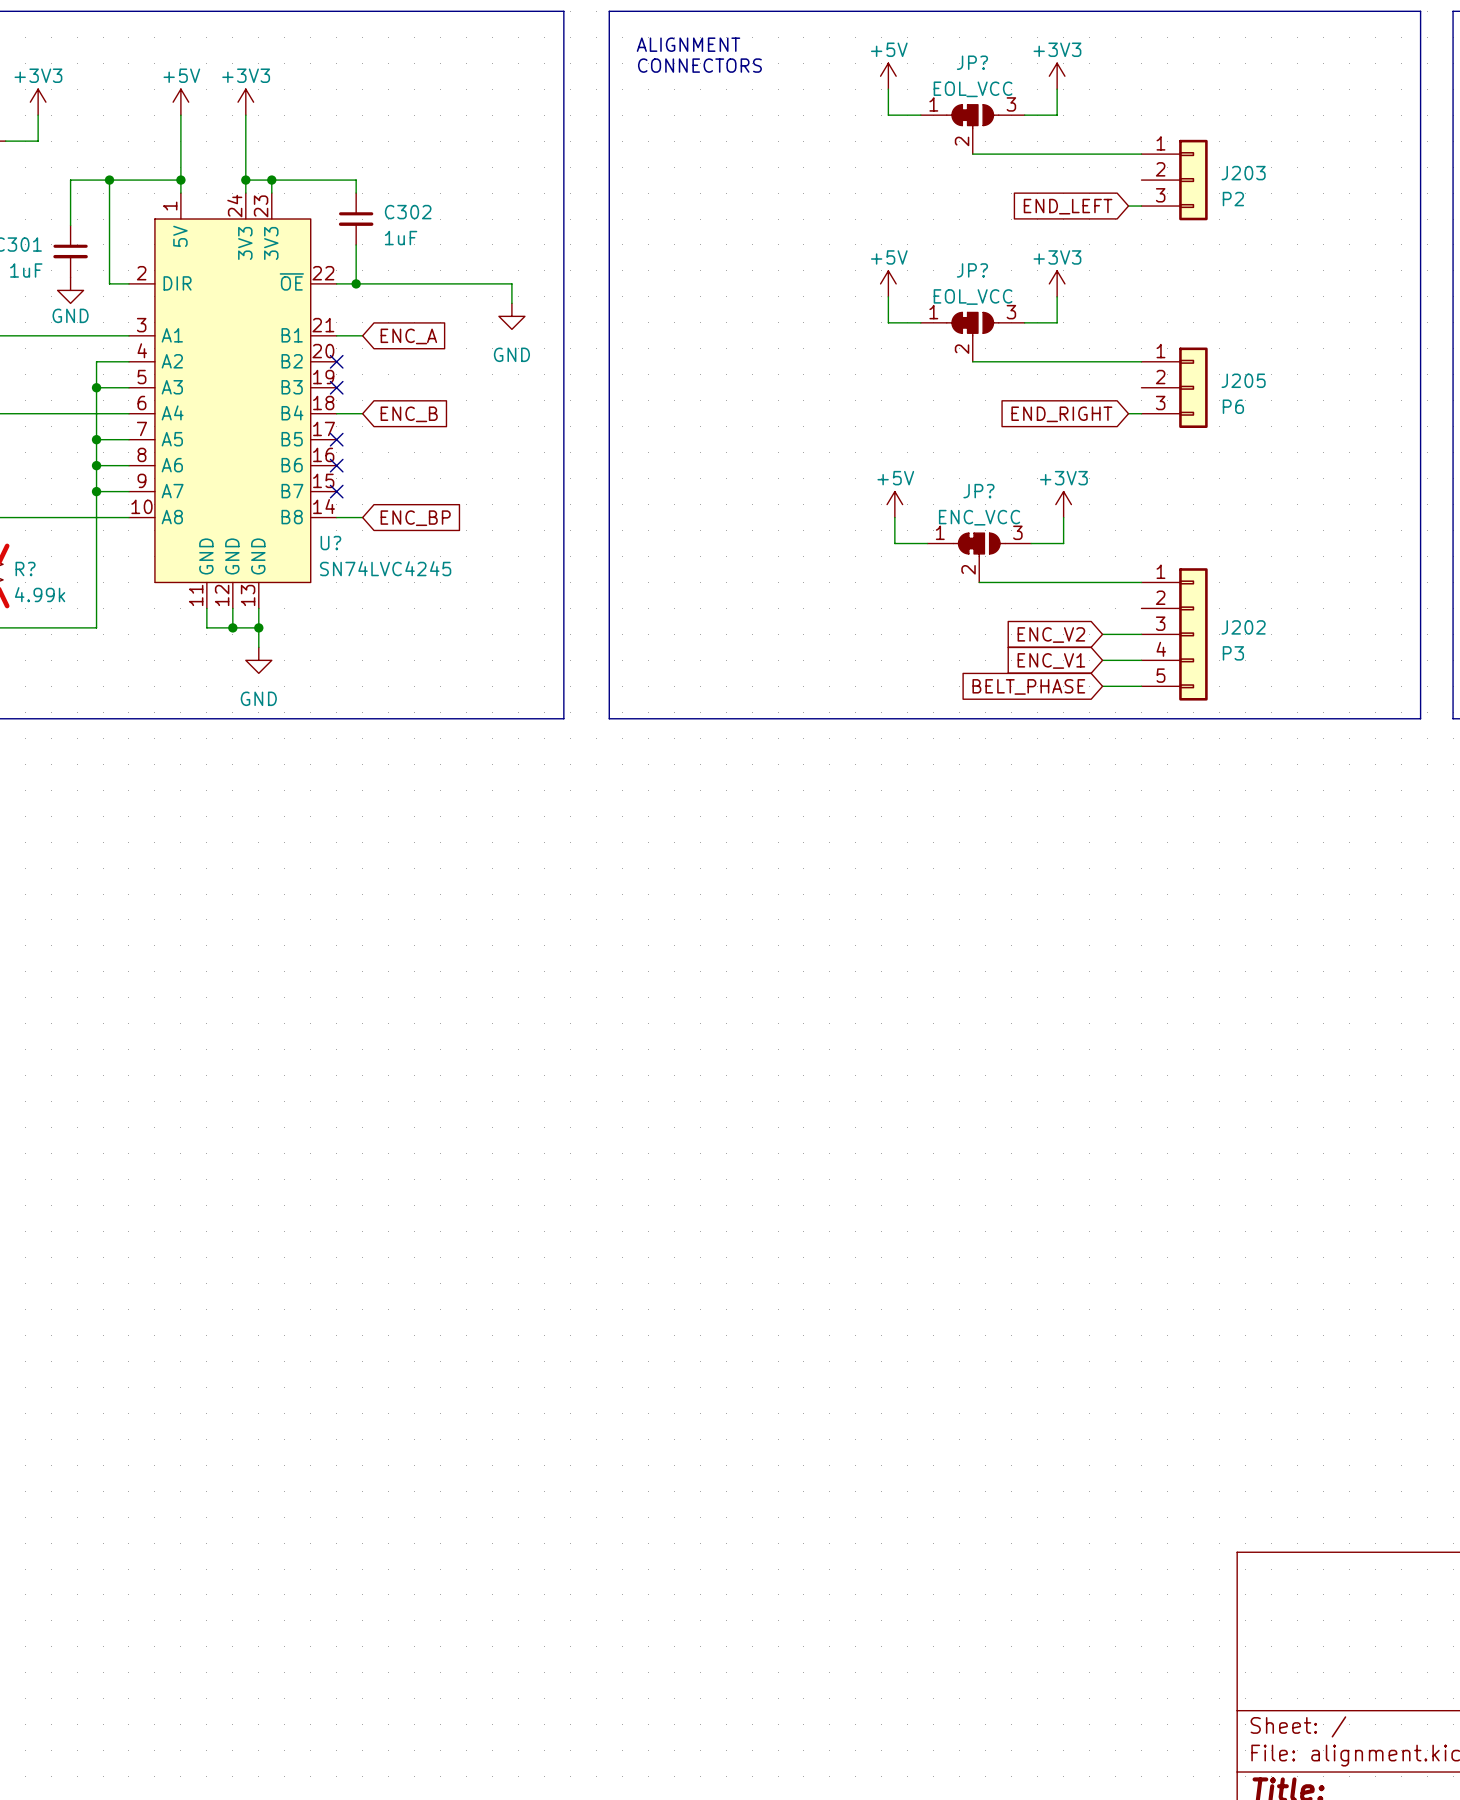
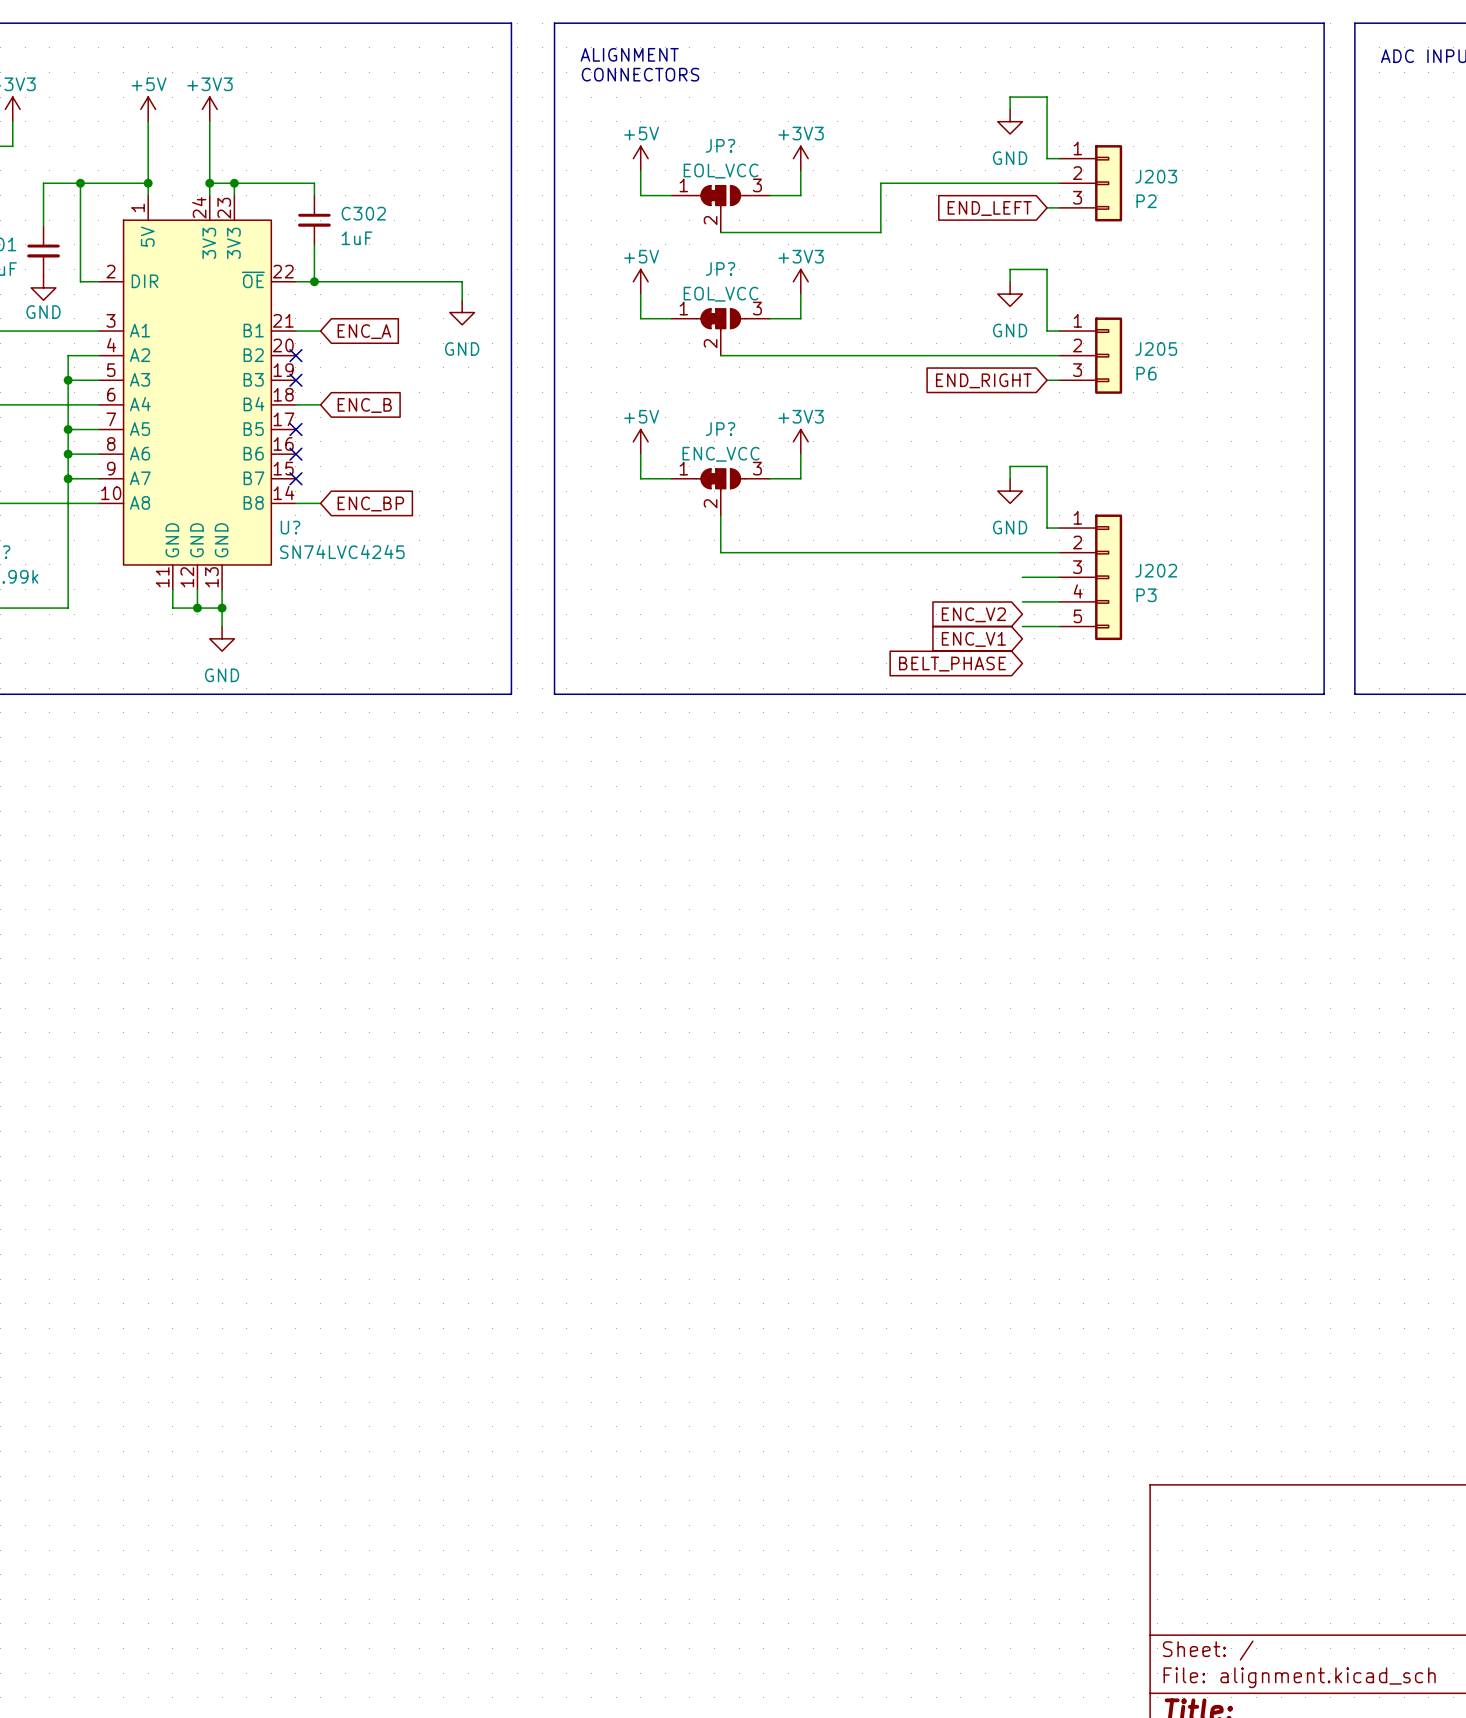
power symbol: +5V (888, 76) -> none
power symbol: +3V3 (1057, 76) -> none
wire: (888, 89) (888, 115) (920, 115) -> (640, 170) (640, 195) (671, 195)
wire: (1057, 89) (1057, 115) (1024, 115) -> (800, 170) (800, 195) (770, 195)
power symbol: none -> GND (1010, 121)
JP?: EOL_VCC (972, 129) -> none
power symbol: none -> +5V (640, 158)
power symbol: none -> +3V3 (800, 158)
wire: (972, 154) (1128, 154) -> (1010, 109) (1010, 97) (1047, 97) (1047, 158)
wire: none -> (1059, 183) (880, 183) (880, 232) (720, 232)
JP?: none -> EOL_VCC (720, 209)
power symbol: none -> +5V (640, 281)
power symbol: none -> +3V3 (800, 281)
power symbol: +5V (888, 283) -> none
power symbol: +3V3 (1057, 283) -> none
wire: none -> (1010, 281) (1010, 269) (1047, 269) (1047, 331) (1059, 331)
wire: (888, 296) (888, 322) (920, 322) -> (640, 294) (640, 318) (671, 318)
wire: (1057, 296) (1057, 322) (1024, 322) -> (800, 294) (800, 318) (770, 318)
power symbol: none -> GND (1010, 294)
JP?: none -> EOL_VCC (720, 332)
JP?: EOL_VCC (972, 337) -> none
wire: none -> (720, 355) (899, 355)
J205 position: (1174, 387) -> (1090, 355)
wire: (1128, 413) (1141, 413) -> (1047, 380) (1059, 380)
global label position: END_RIGHT (1061, 414) -> END_RIGHT (983, 380)
power symbol: none -> +5V (640, 441)
power symbol: none -> +3V3 (800, 441)
wire: none -> (1010, 478) (1010, 466) (1047, 466) (1047, 528) (1059, 528)
power symbol: +5V (894, 504) -> none
power symbol: +3V3 (1063, 504) -> none
power symbol: none -> GND (1010, 491)
wire: (894, 517) (894, 543) (927, 543) -> (640, 454) (640, 478) (671, 478)
wire: (1063, 517) (1063, 543) (1031, 543) -> (800, 454) (800, 478) (770, 478)
wire: none -> (720, 515) (720, 552) (1059, 552)
JP? position: (979, 557) -> (720, 492)
wire: (979, 582) (1141, 582) -> none
wire: (1102, 634) (1141, 634) -> (1022, 577) (1059, 577)
J202 position: (1174, 634) -> (1090, 577)
wire: (1102, 660) (1141, 660) -> (1022, 601) (1059, 601)
wire: (1102, 686) (1141, 686) -> (1022, 626) (1059, 626)

